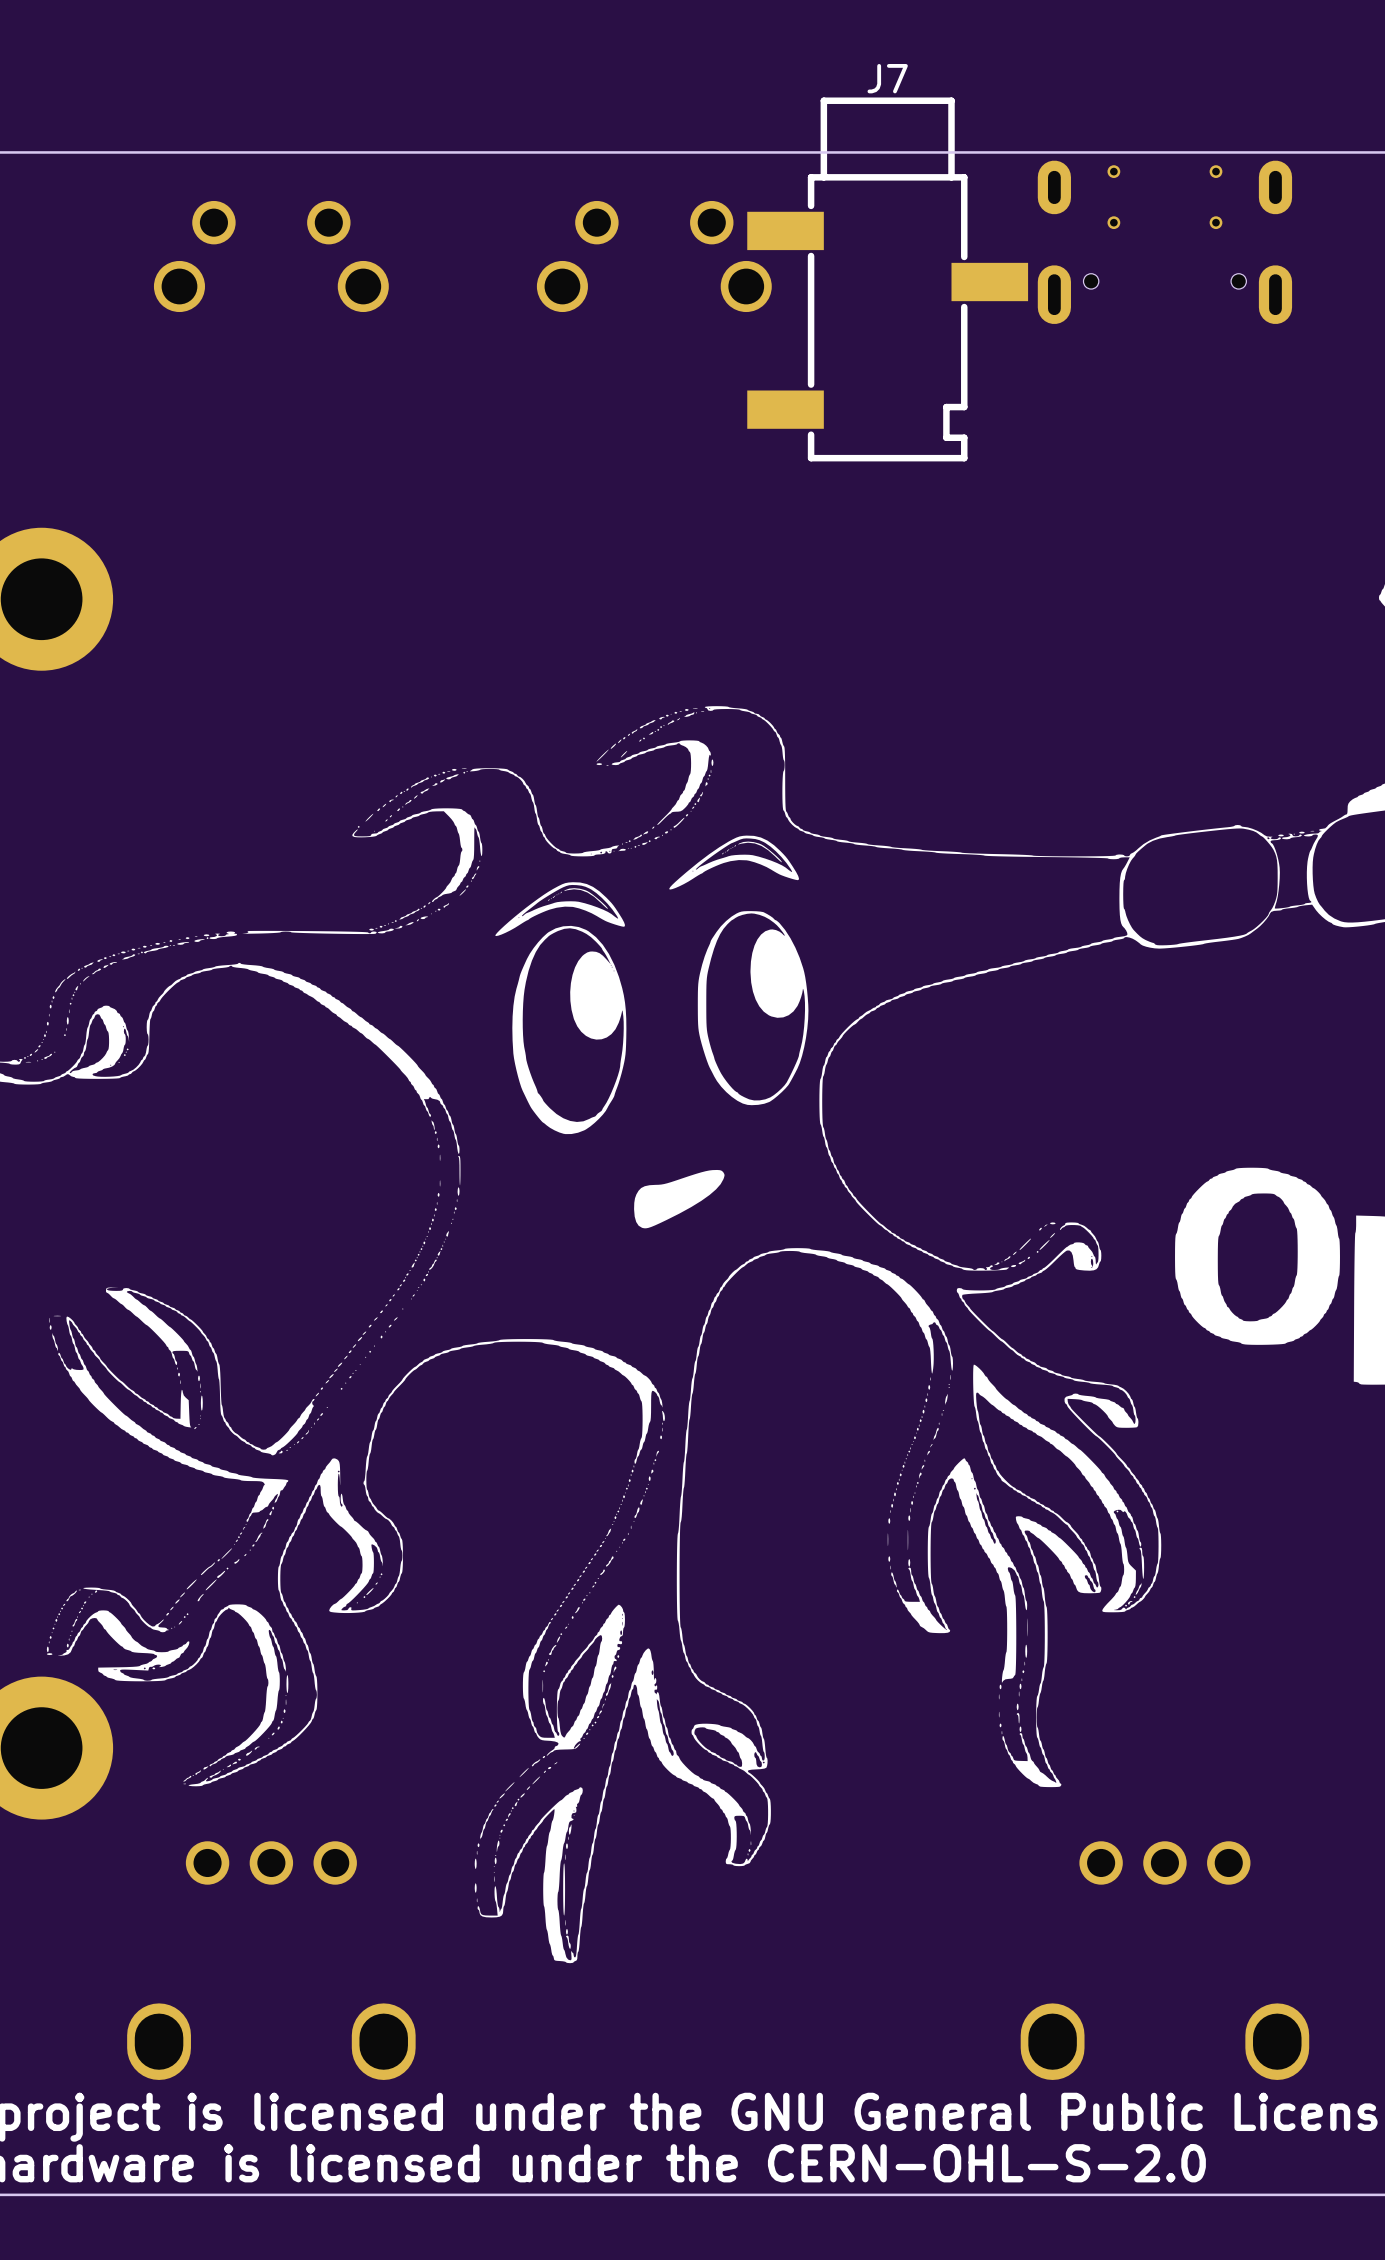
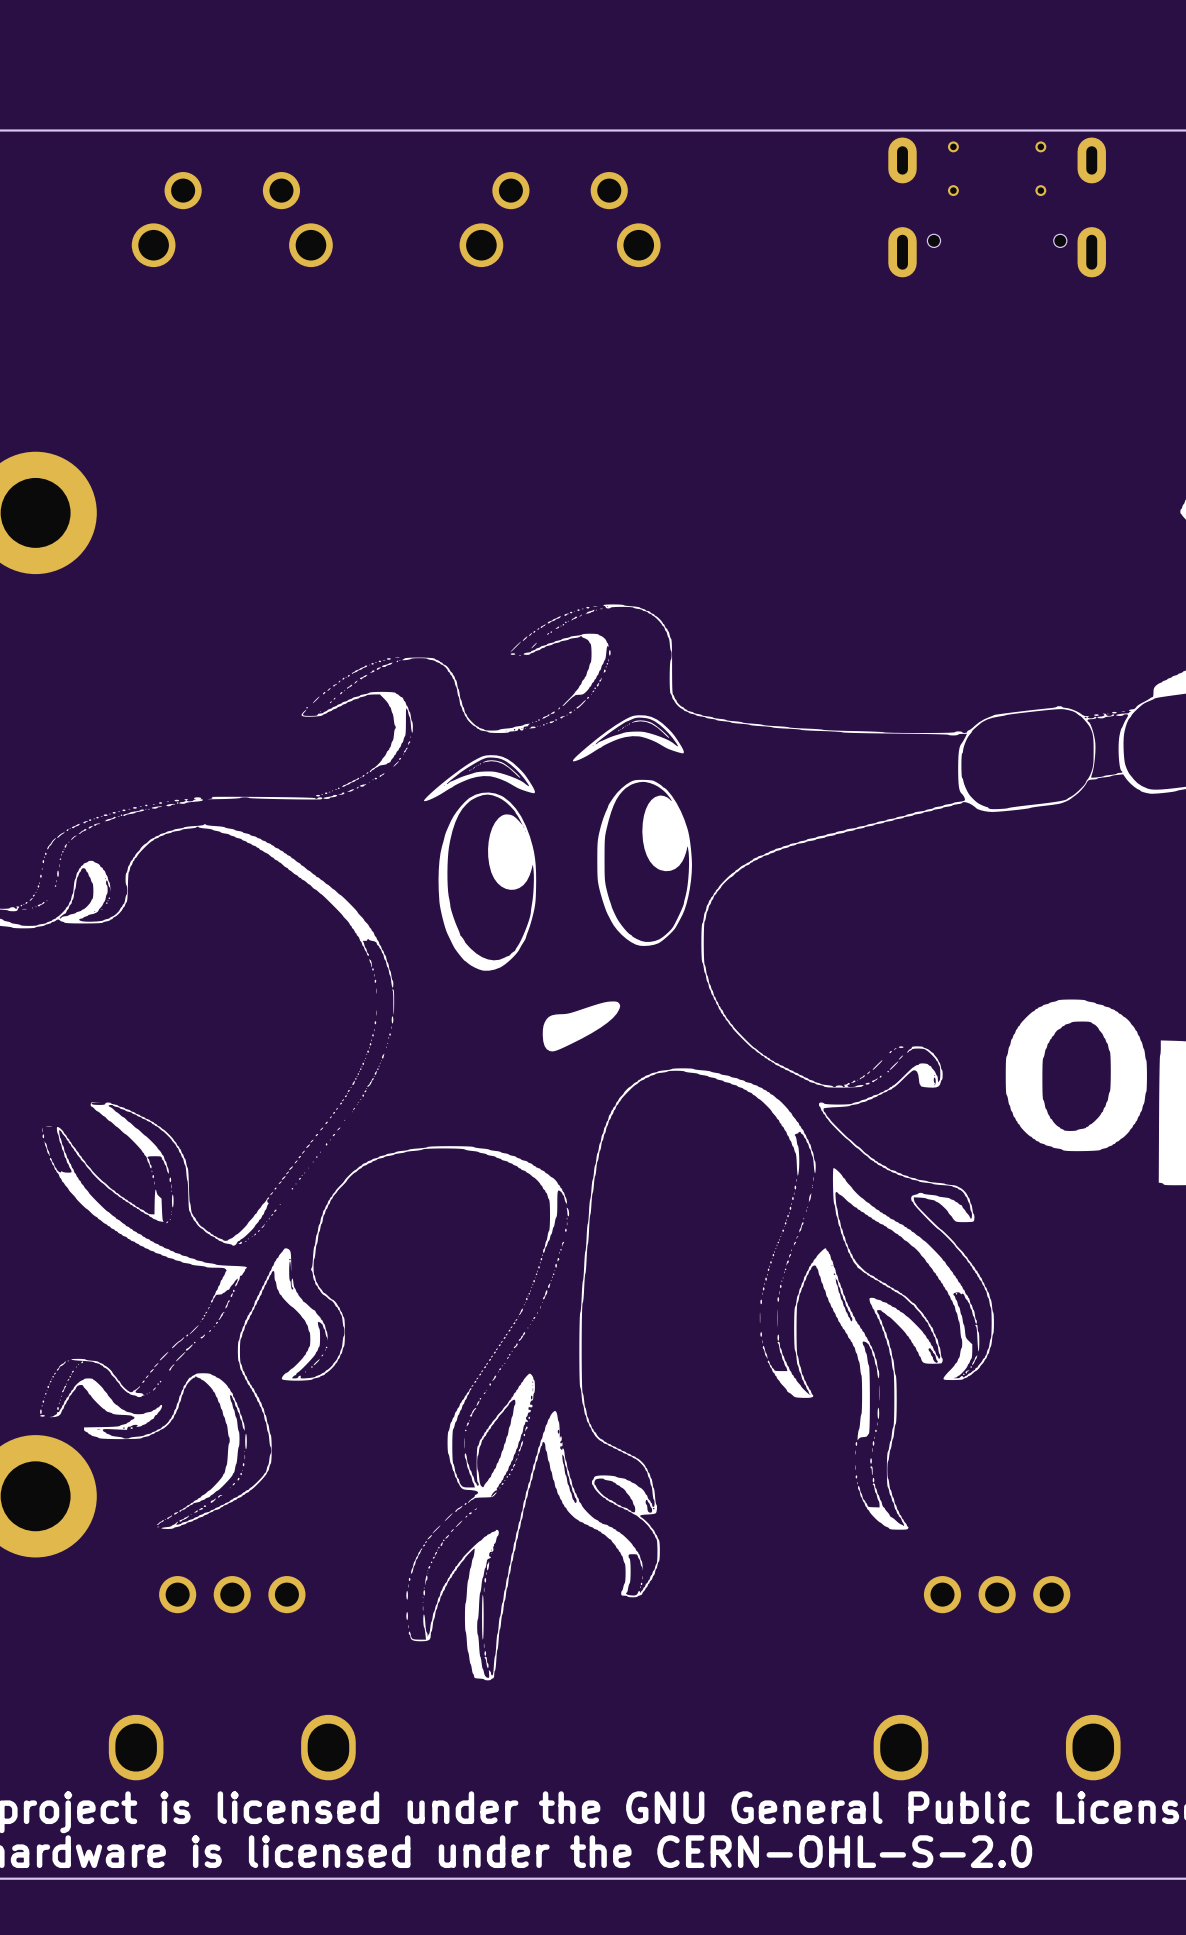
J7: (887, 279) -> none

